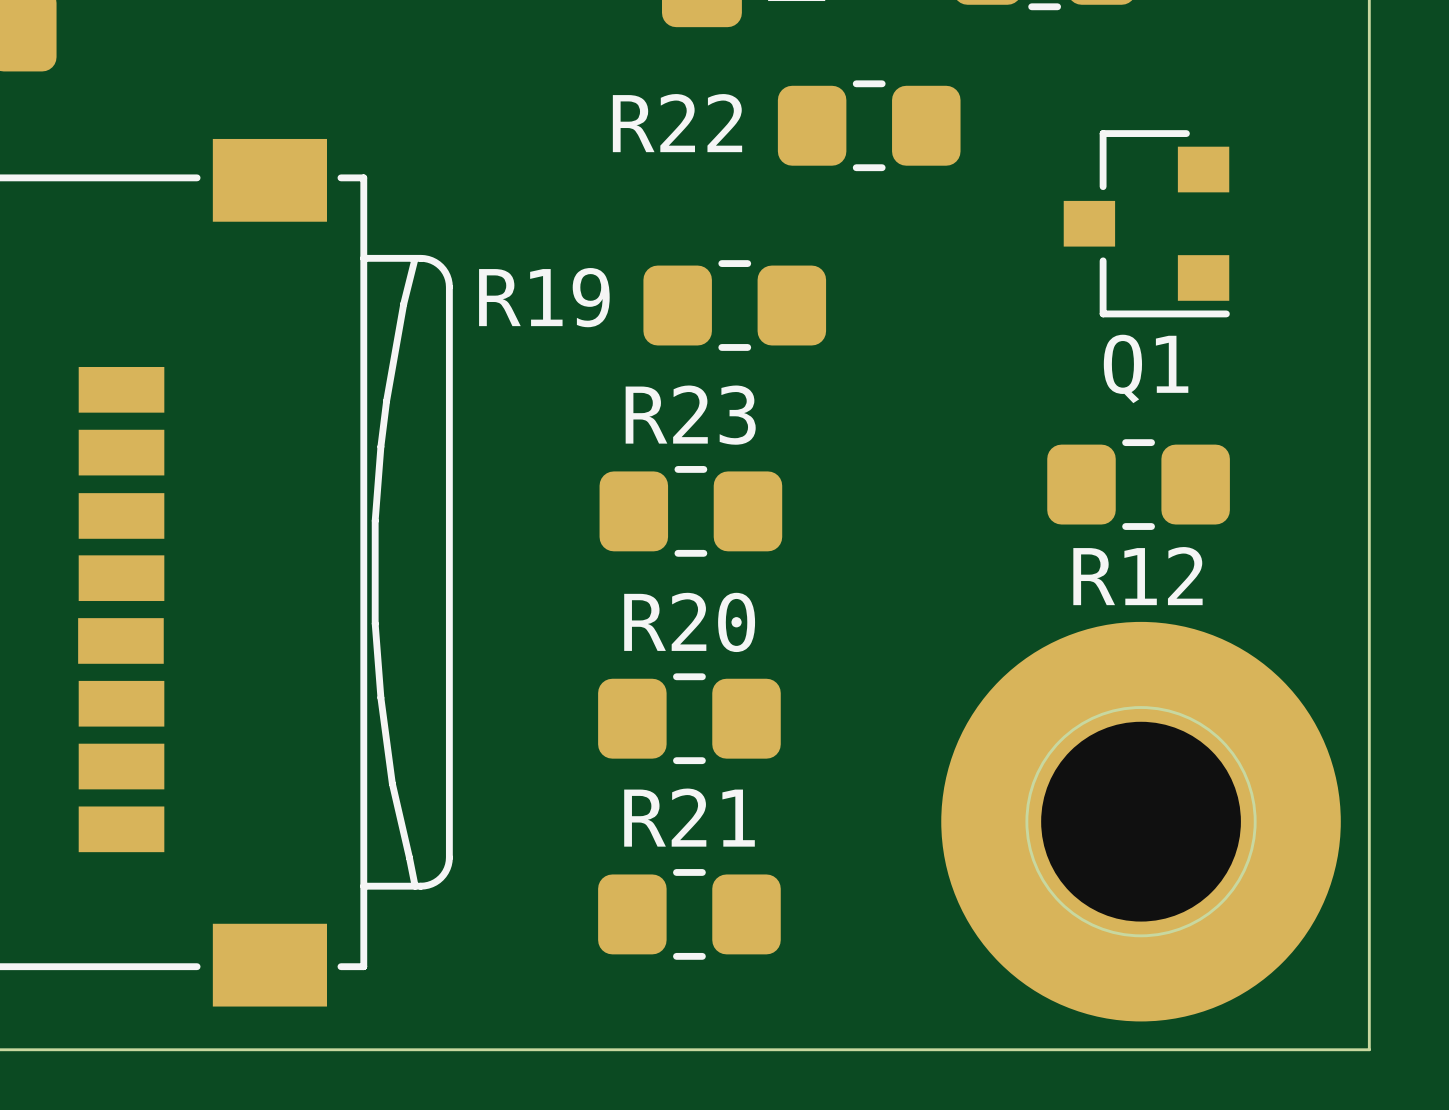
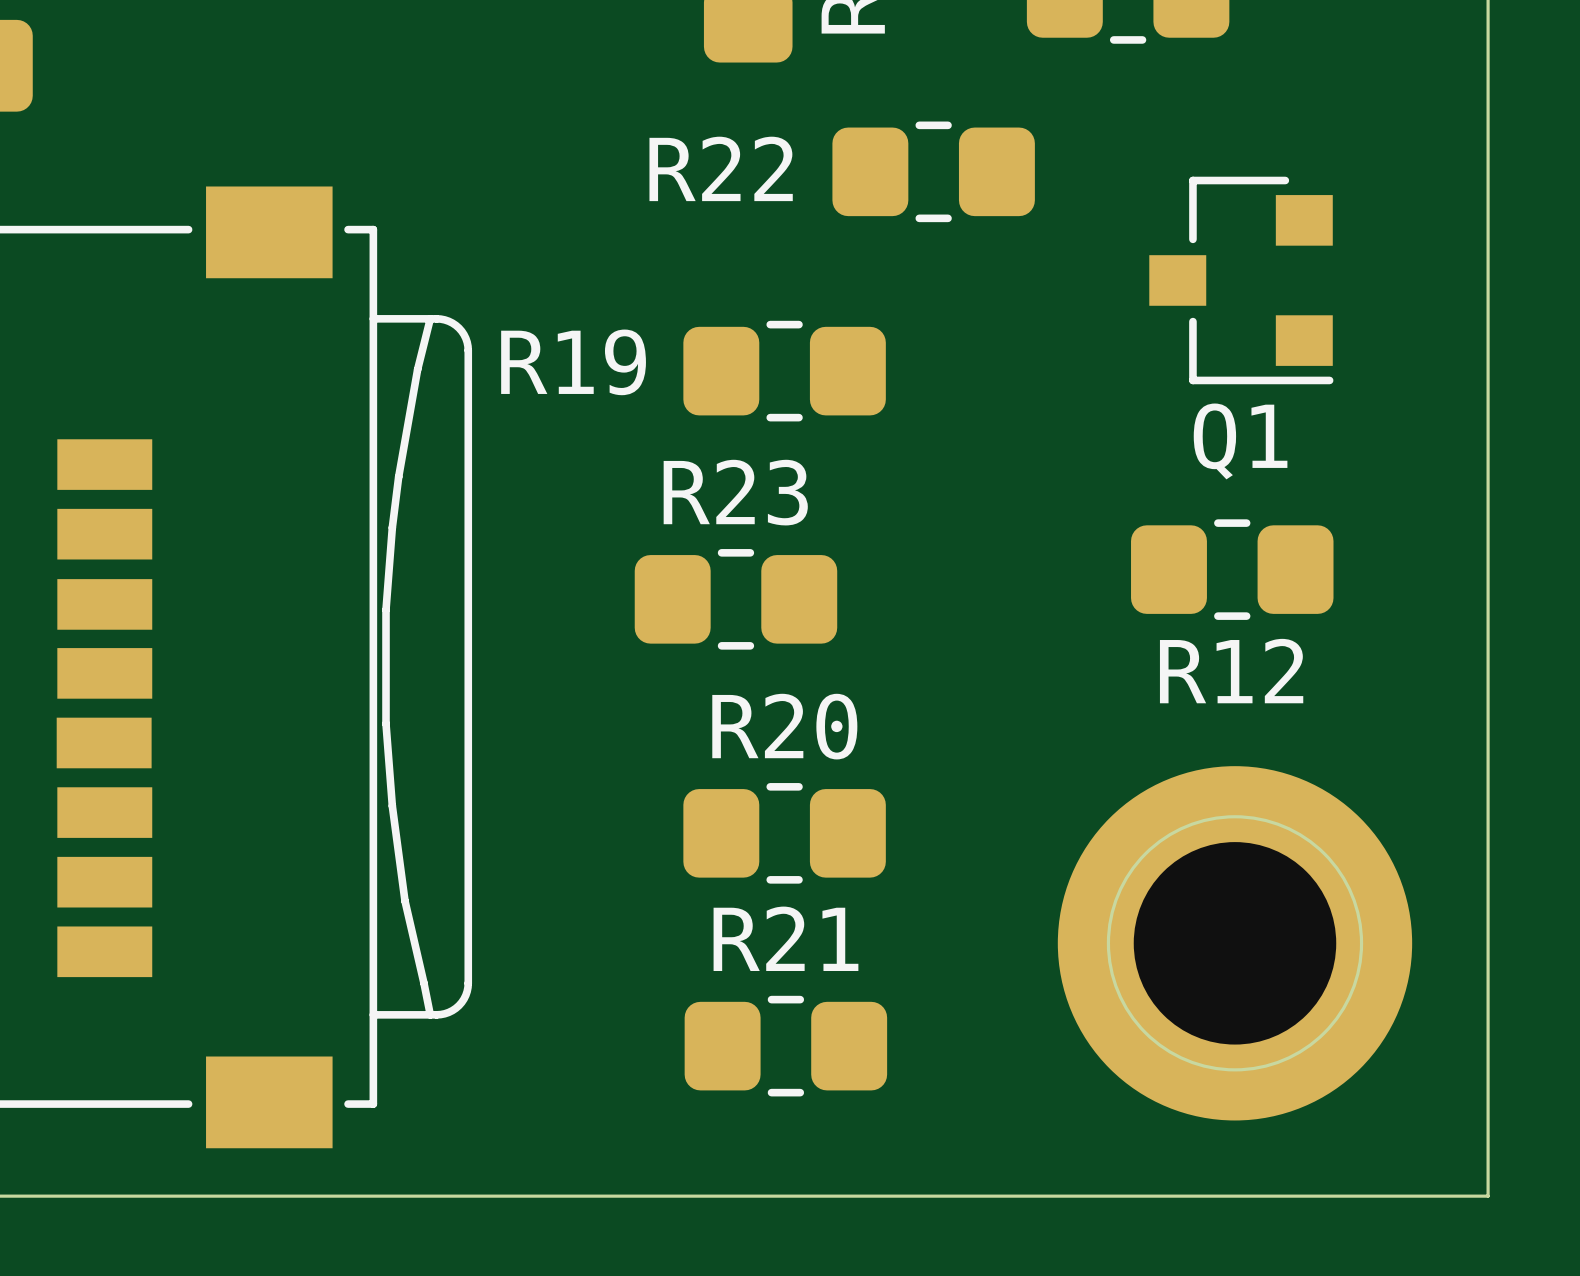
part footprint: [941, 621, 1341, 1022] -> [1057, 766, 1413, 1121]
R20 position: (689, 718) -> (784, 833)
R21 position: (689, 914) -> (785, 1046)

